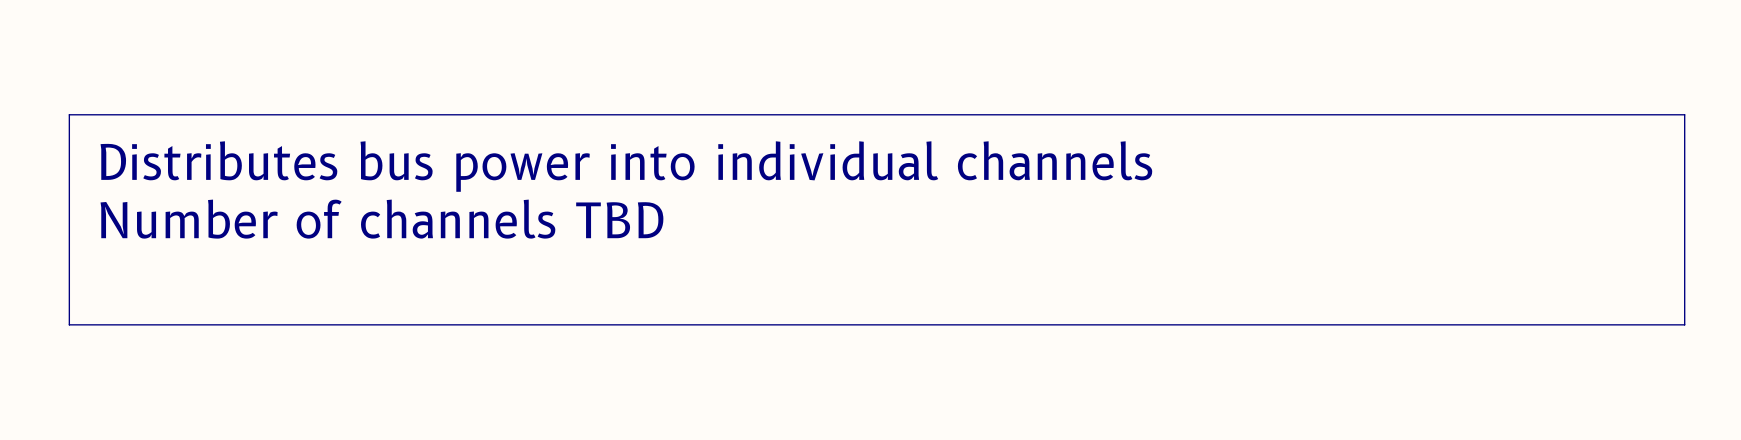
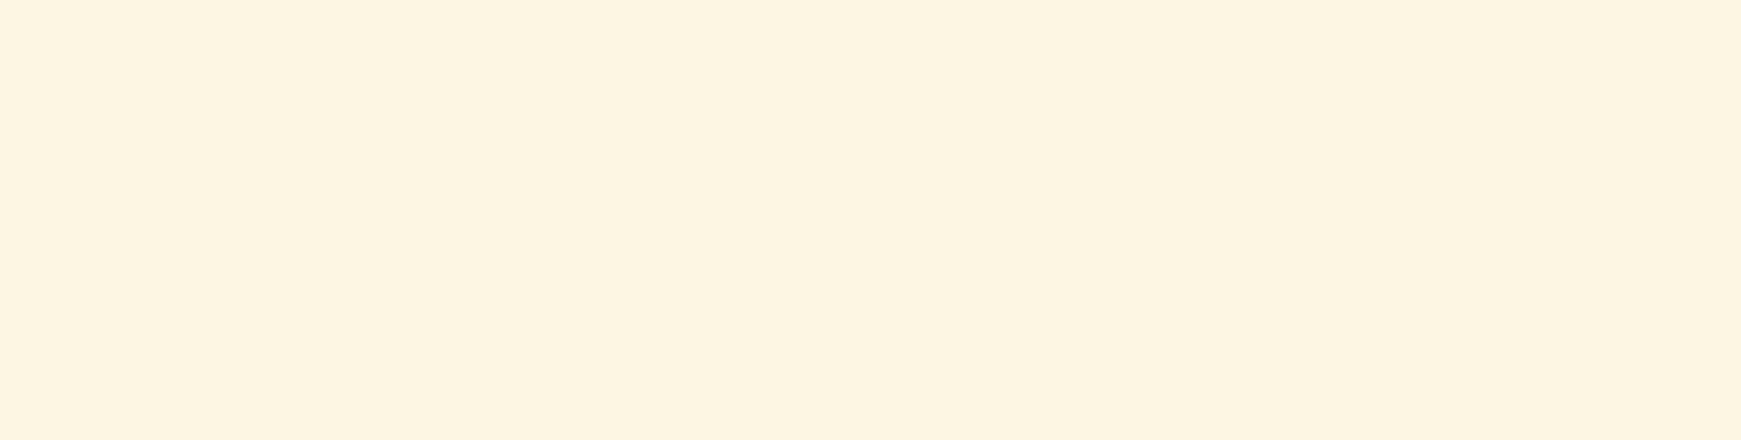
line: (69, 114) (1684, 114) (1684, 324) (69, 324) (69, 114) -> none
text: Distributes bus power into individual channels (626, 166) -> none
text: Number of channels TBD (381, 219) -> none

